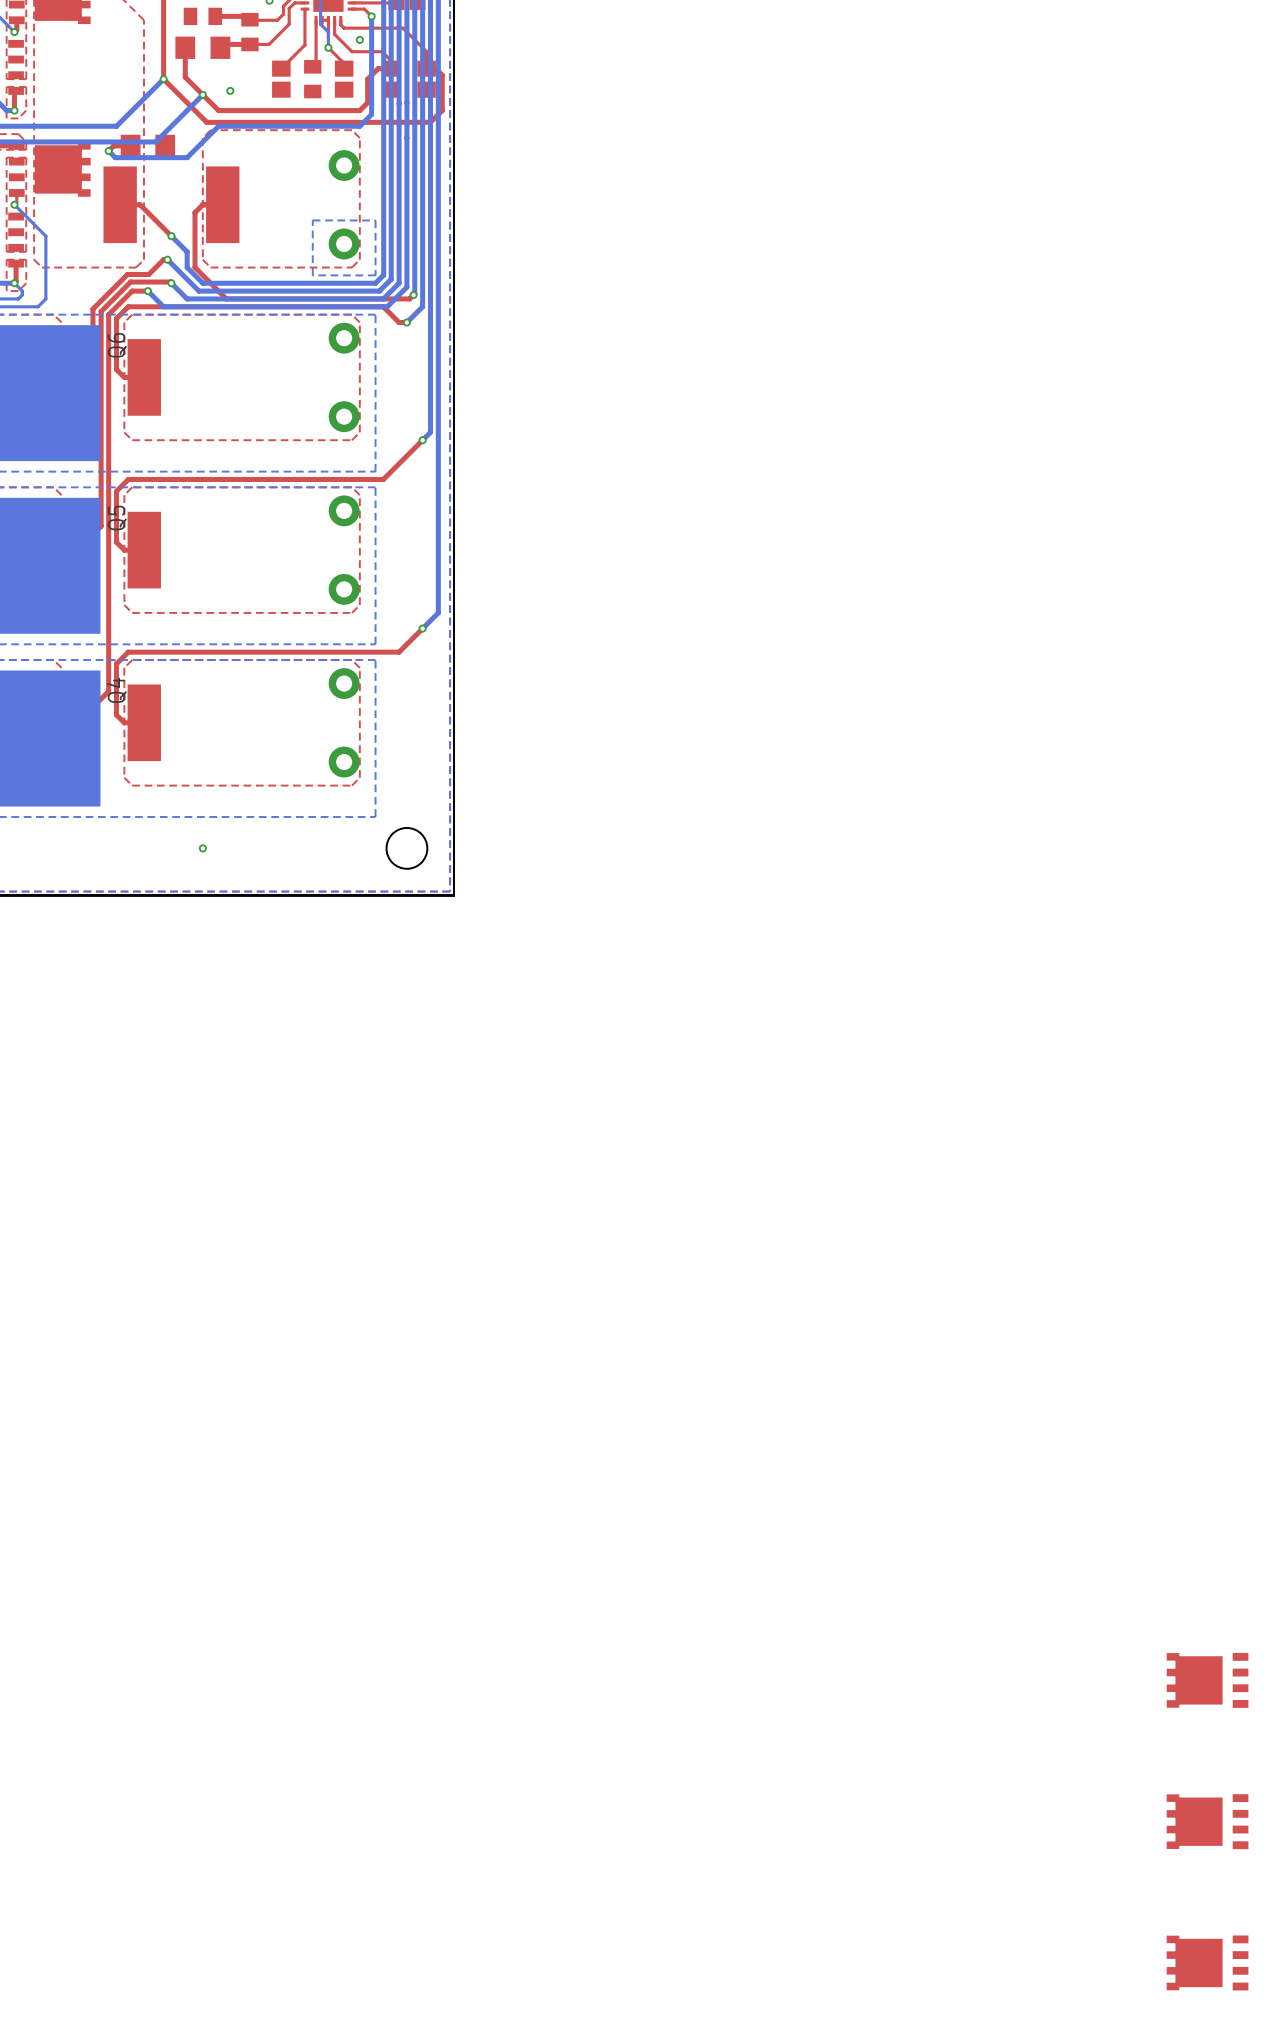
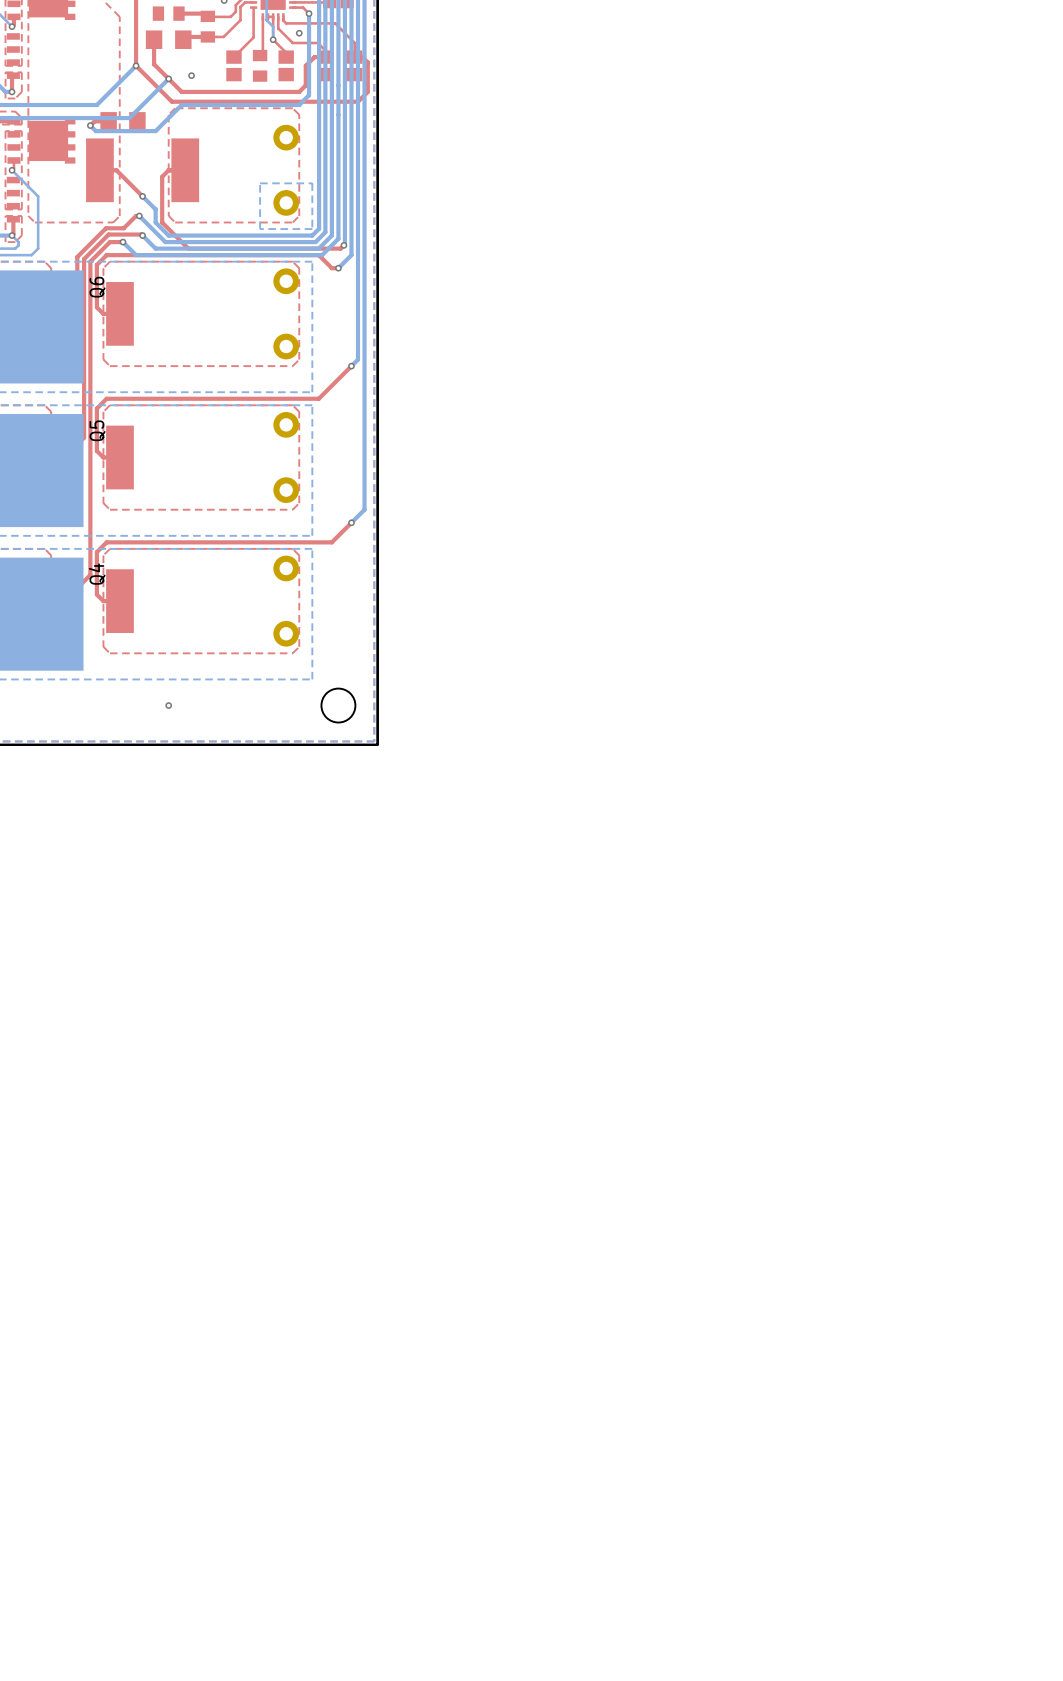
part: (1207, 1680) -> none
part: (1207, 1821) -> none
part: (1207, 1962) -> none

